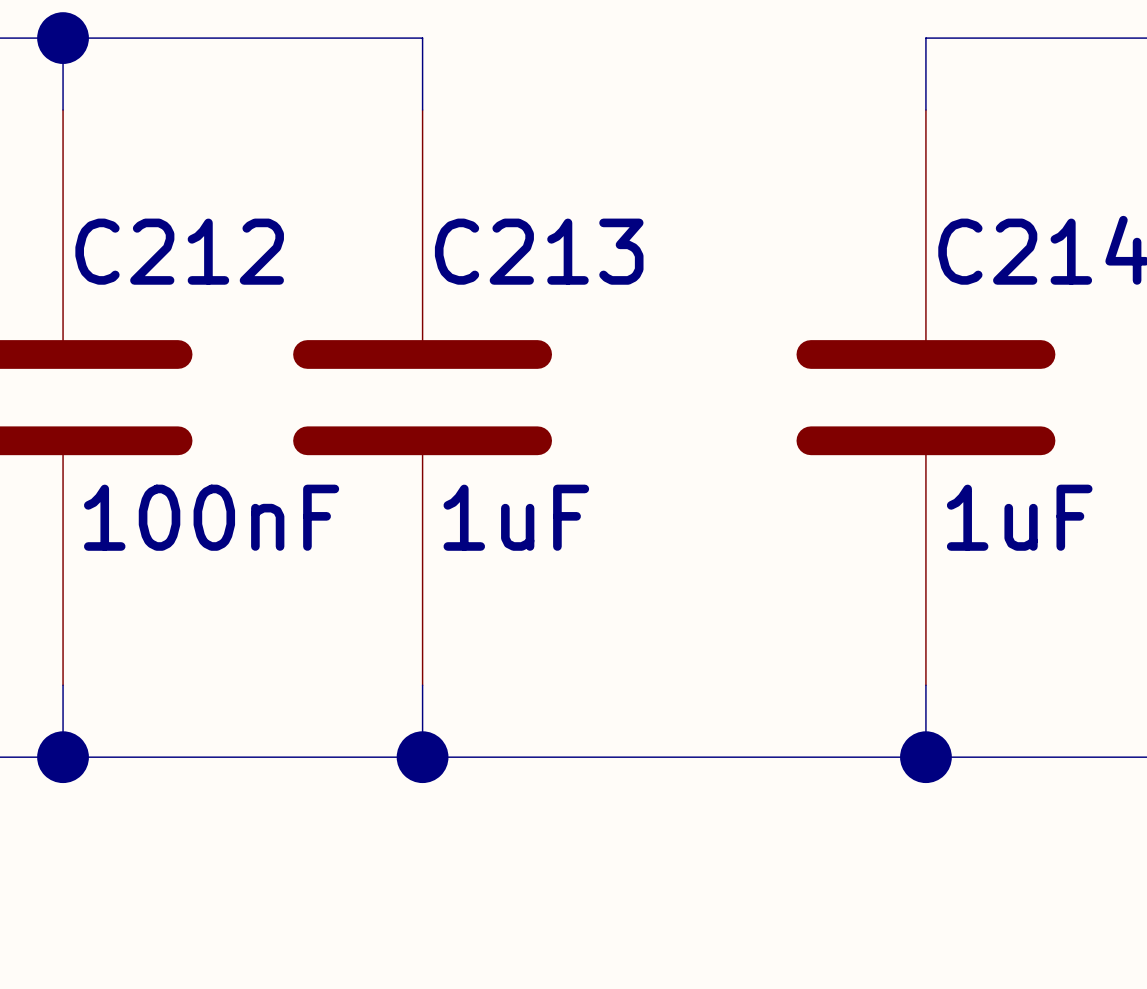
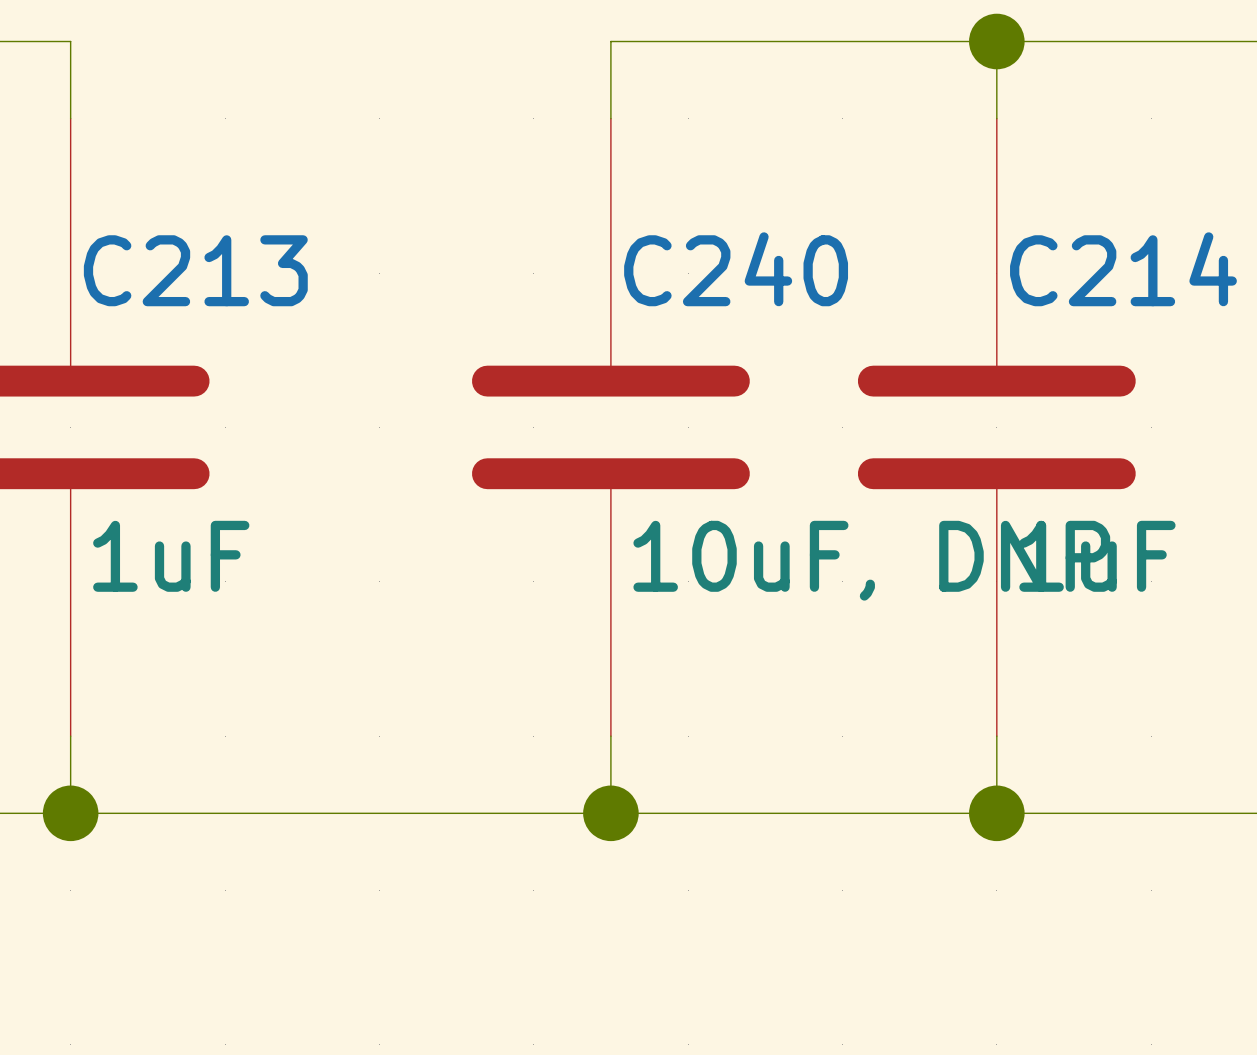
wire: (63, 38) (422, 38) (422, 109) -> none
junction: (63, 38) -> none
wire: none -> (996, 41) (610, 41) (610, 118)
junction: none -> (996, 41)
C212 name: C212 (179, 251) -> C213 (195, 270)
C213: 1uF (422, 397) -> none
C240: none -> 10uF, DNP (610, 427)
C212 value: 100nF (211, 517) -> 1uF (171, 556)
wire: (422, 685) (422, 757) -> (610, 736) (610, 813)
junction position: (422, 757) -> (610, 813)

